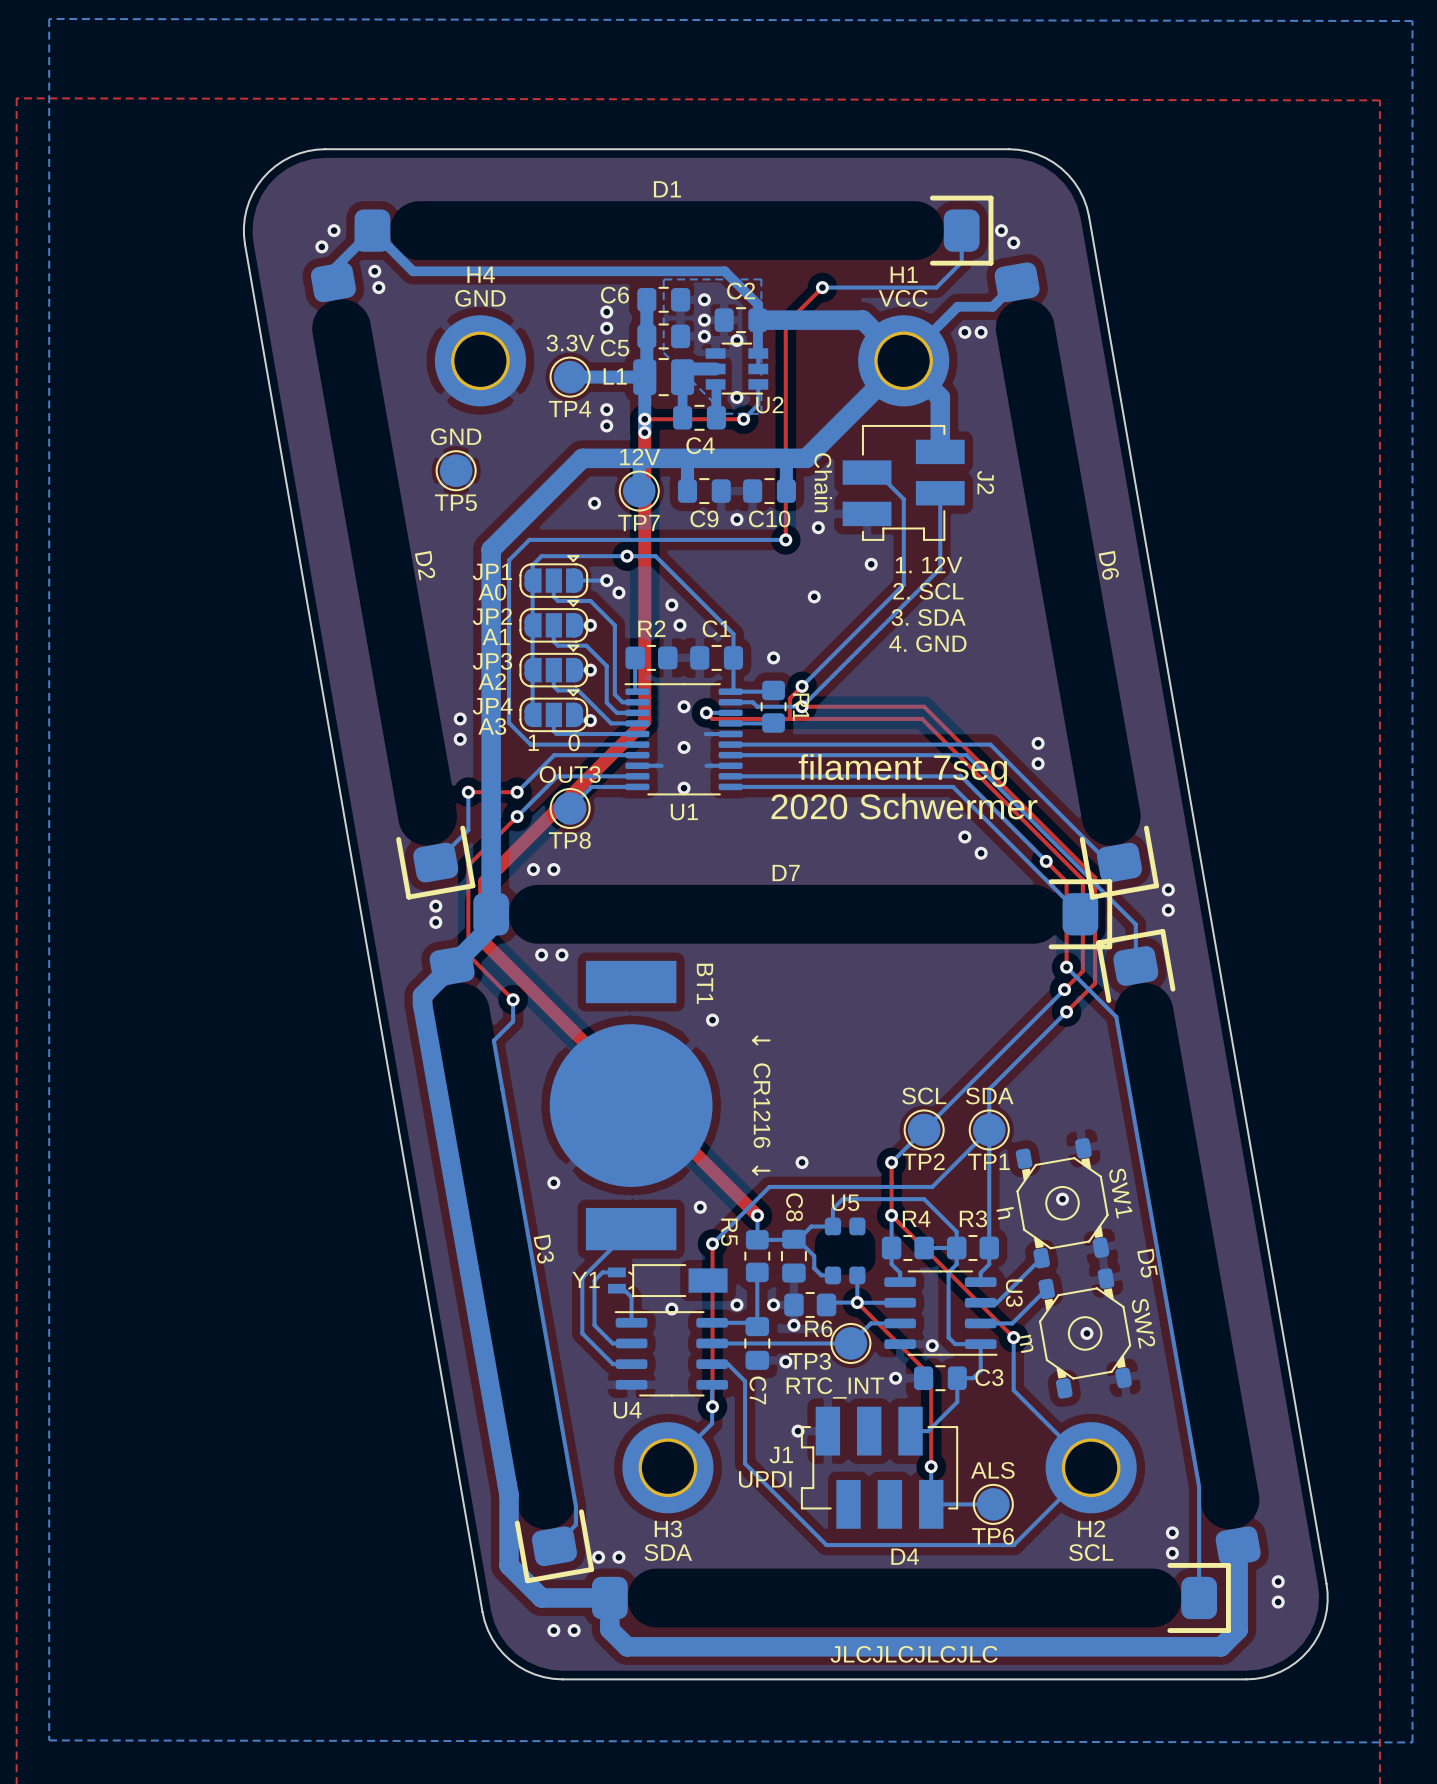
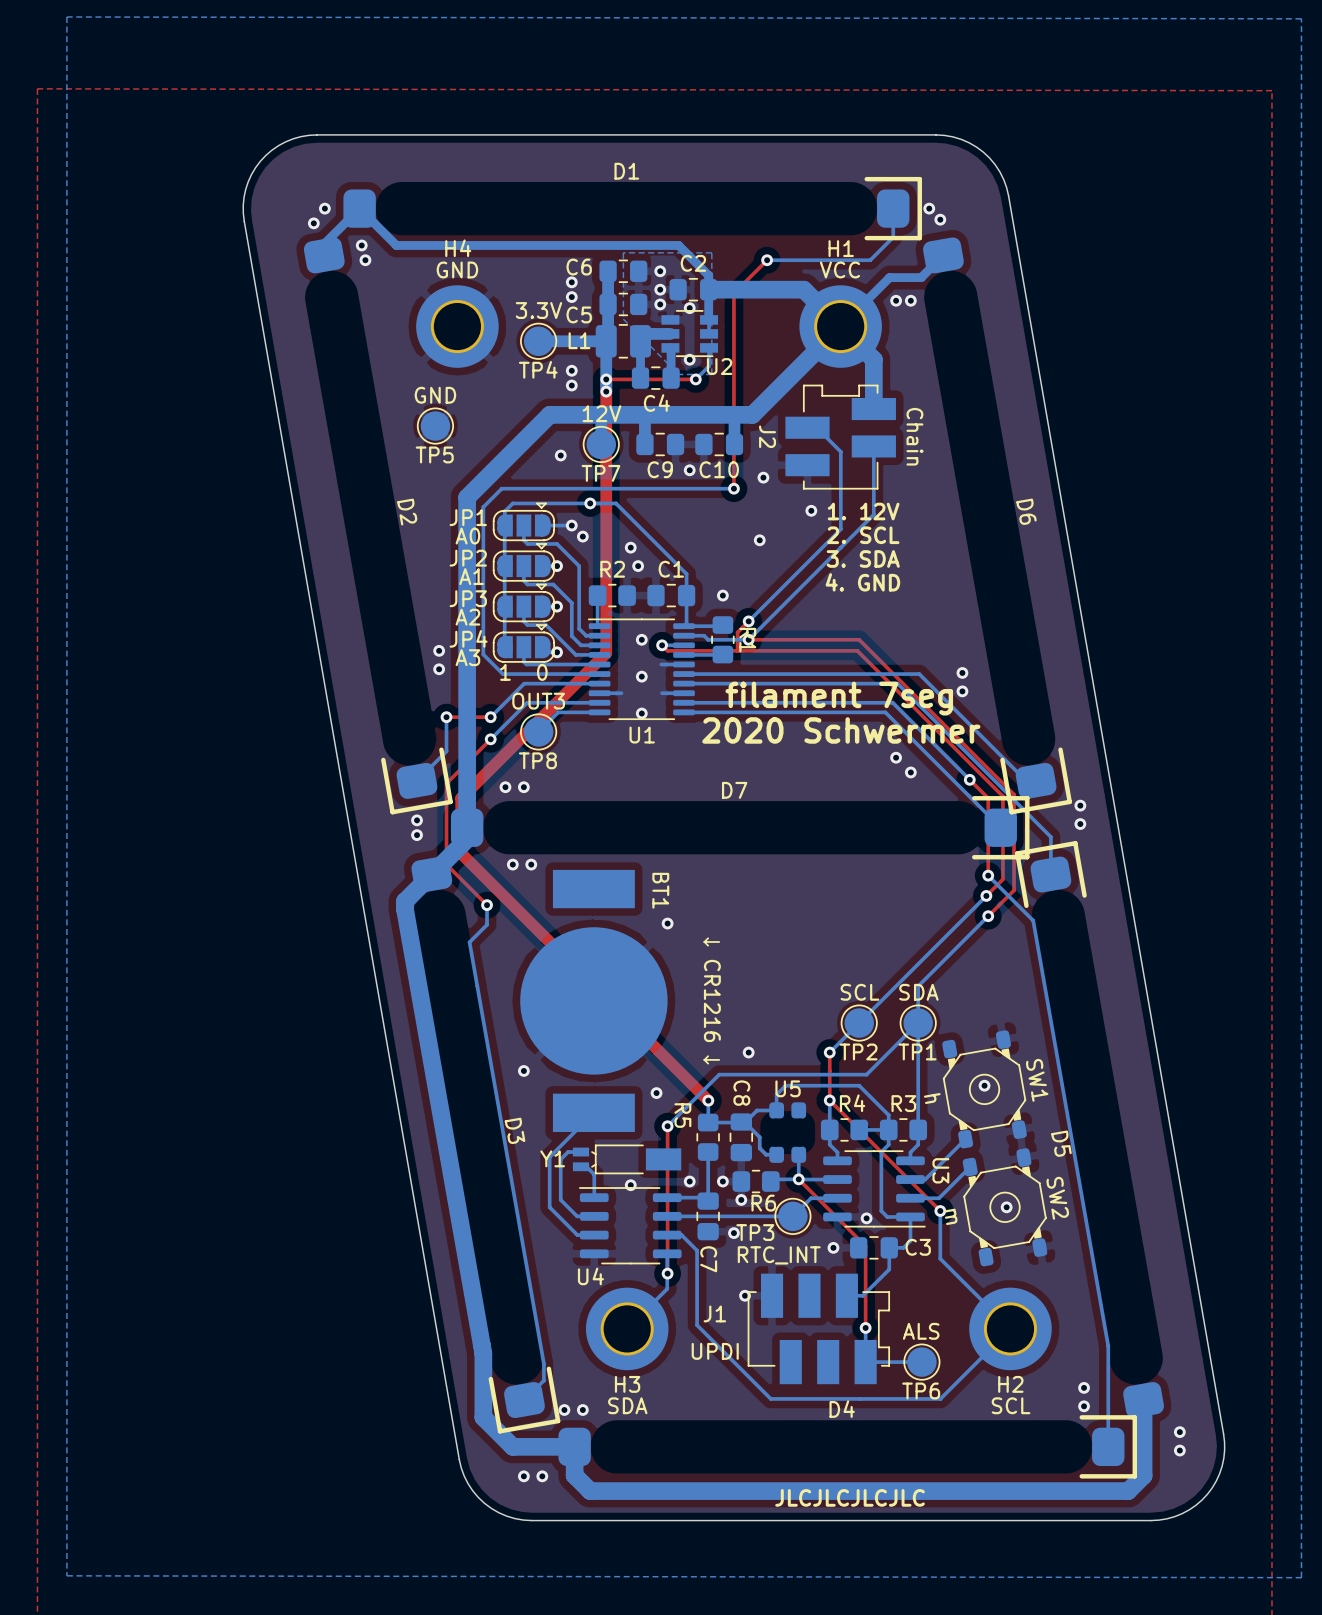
J2 rotation: 0° (903, 482) -> 180° (840, 437)
J1 rotation: 0° (879, 1467) -> 180° (818, 1328)

